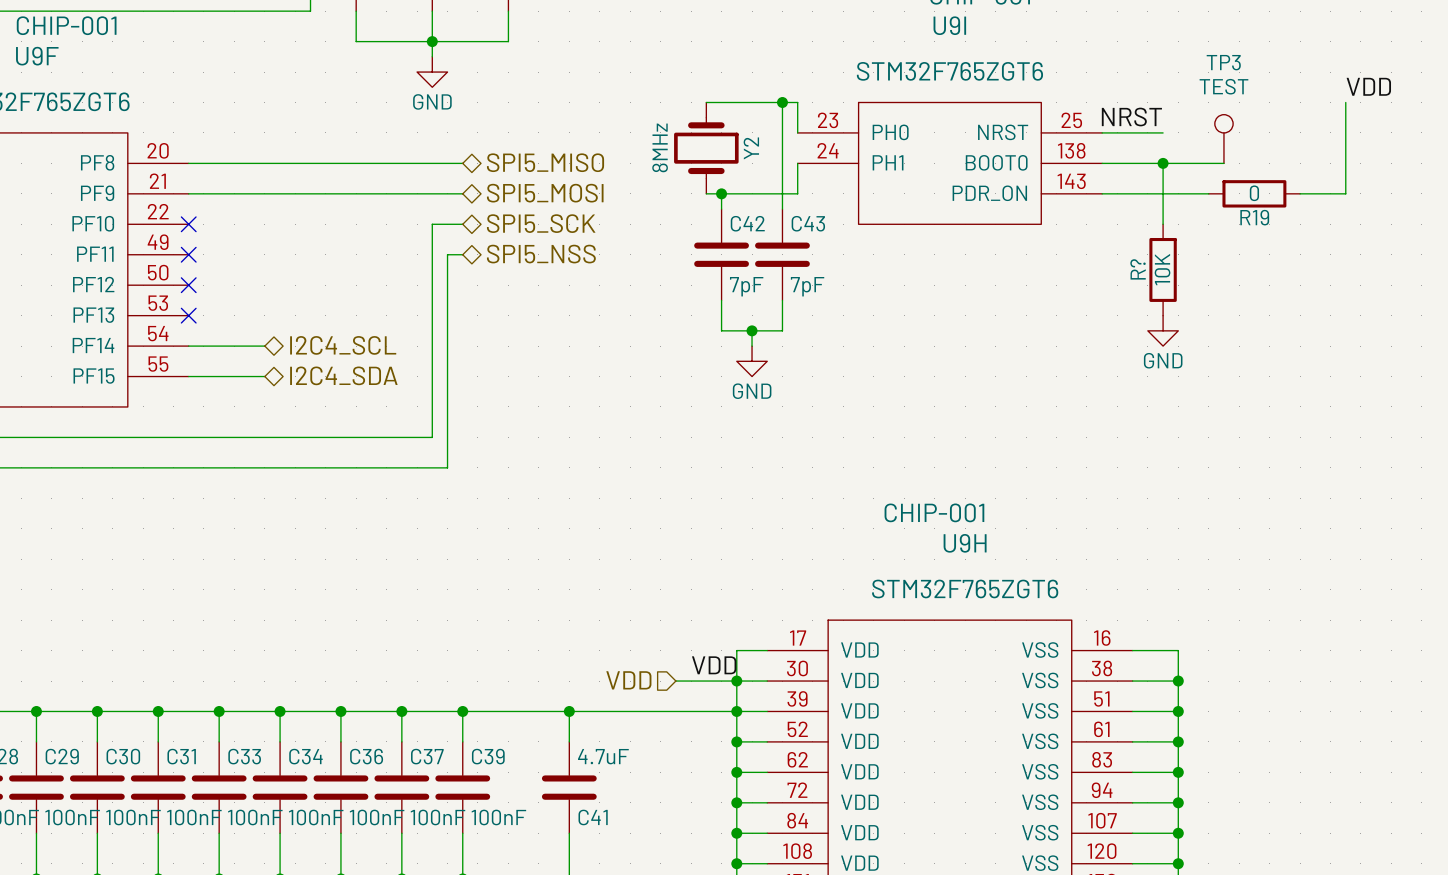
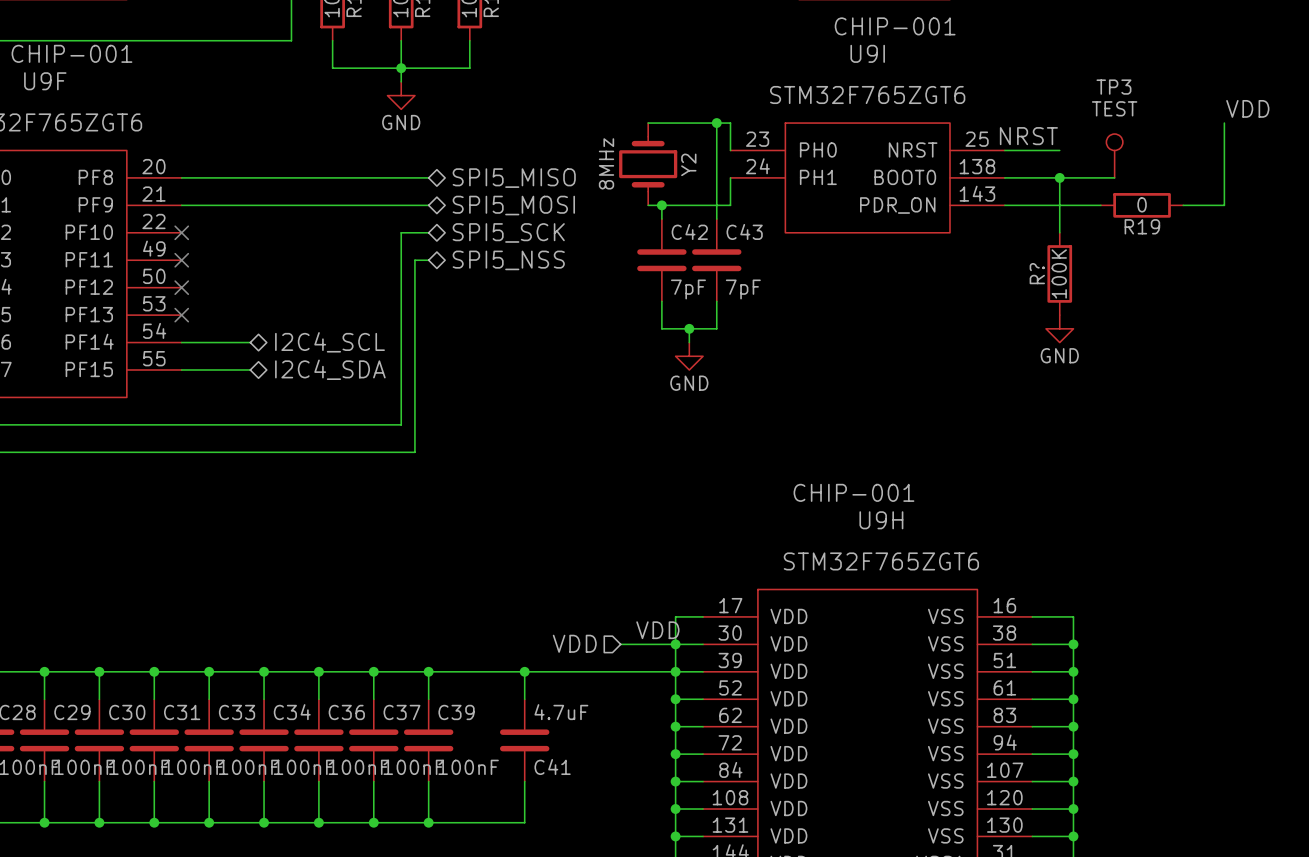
R? value: 10K (1162, 269) -> 100K (1059, 273)

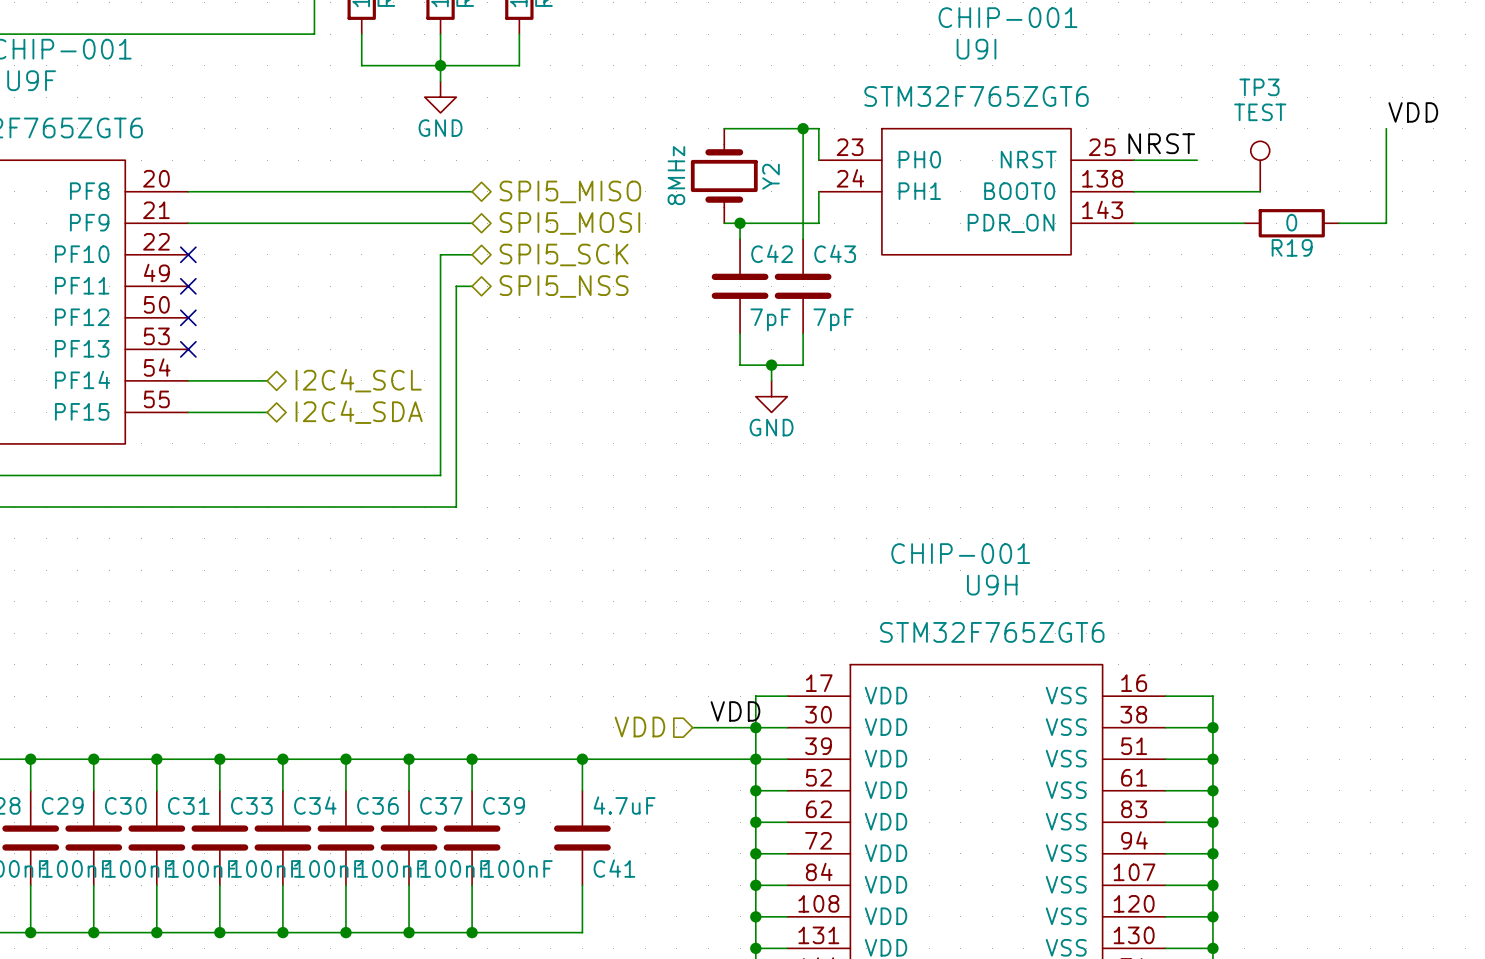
wire: (1059, 177) (1059, 232) -> none
junction: (1059, 177) -> none
R?: 100K (1059, 273) -> none
power symbol: GND (1059, 328) -> none

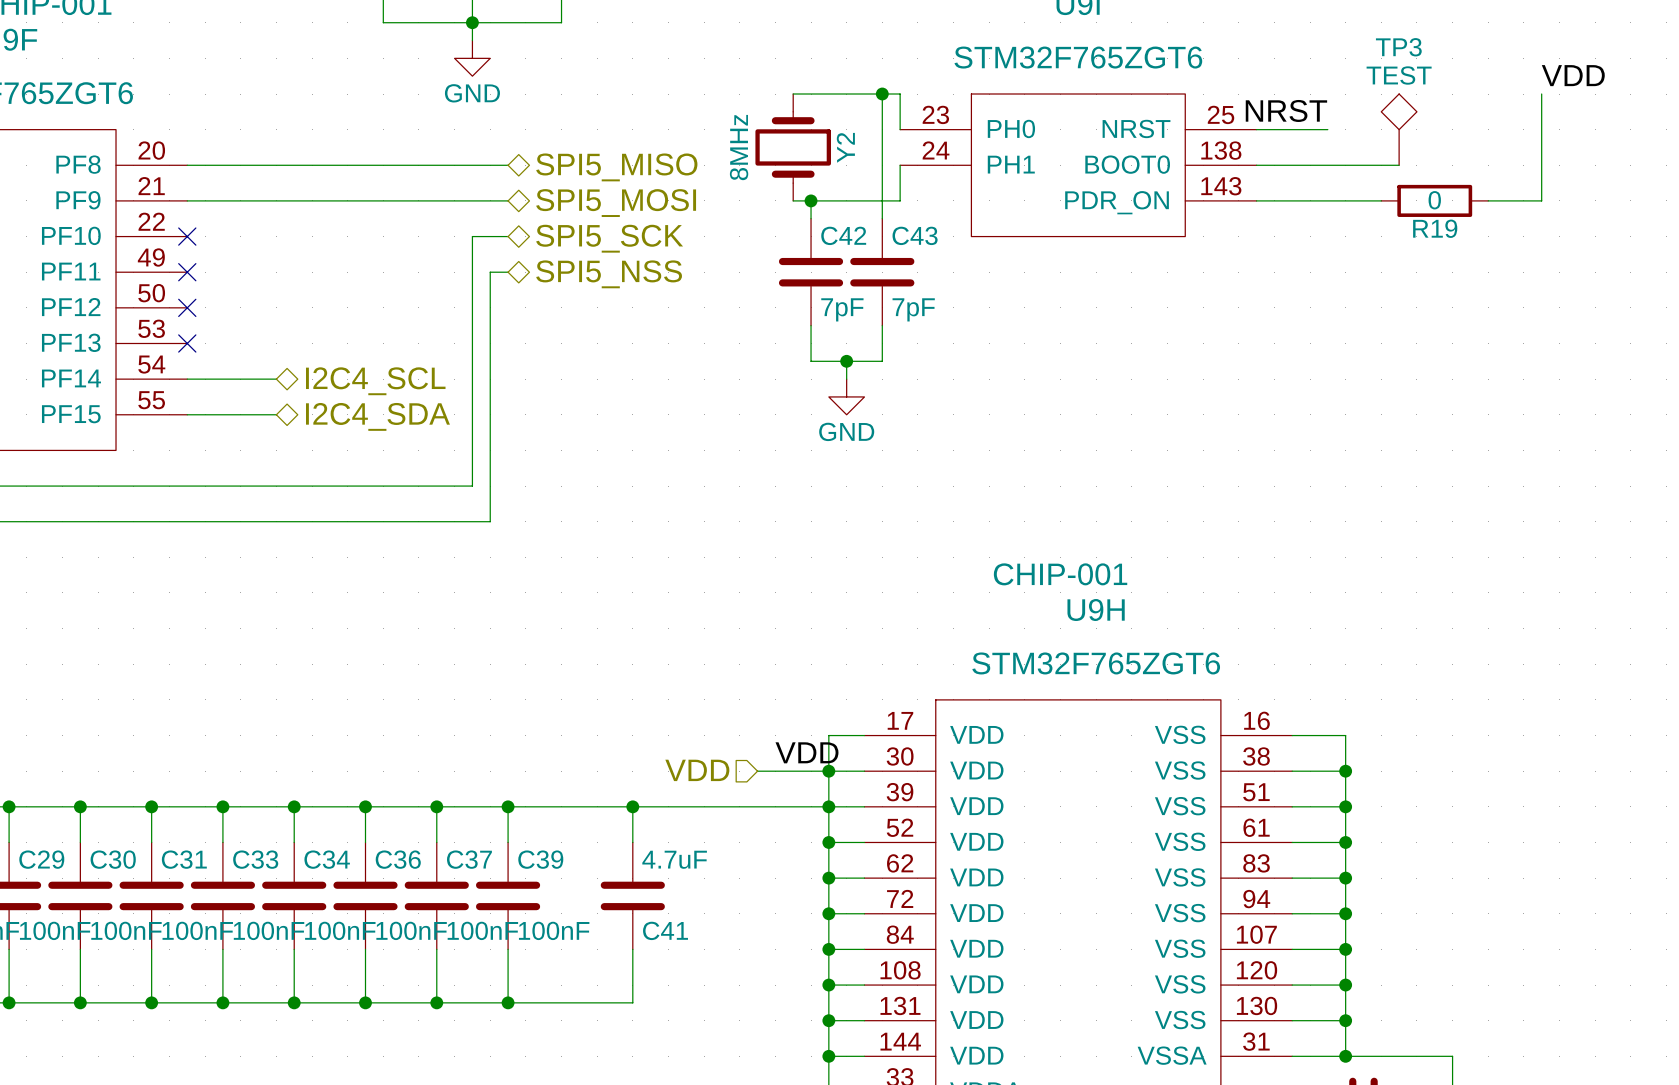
TP3 symbol: [1250, 141, 1270, 192] -> [1381, 94, 1417, 166]

